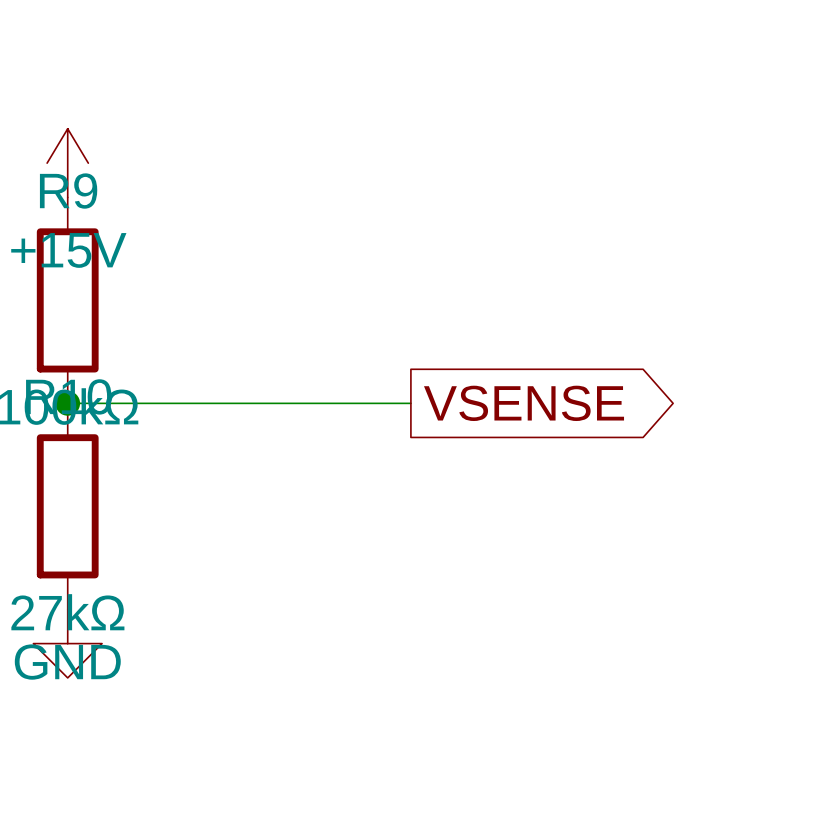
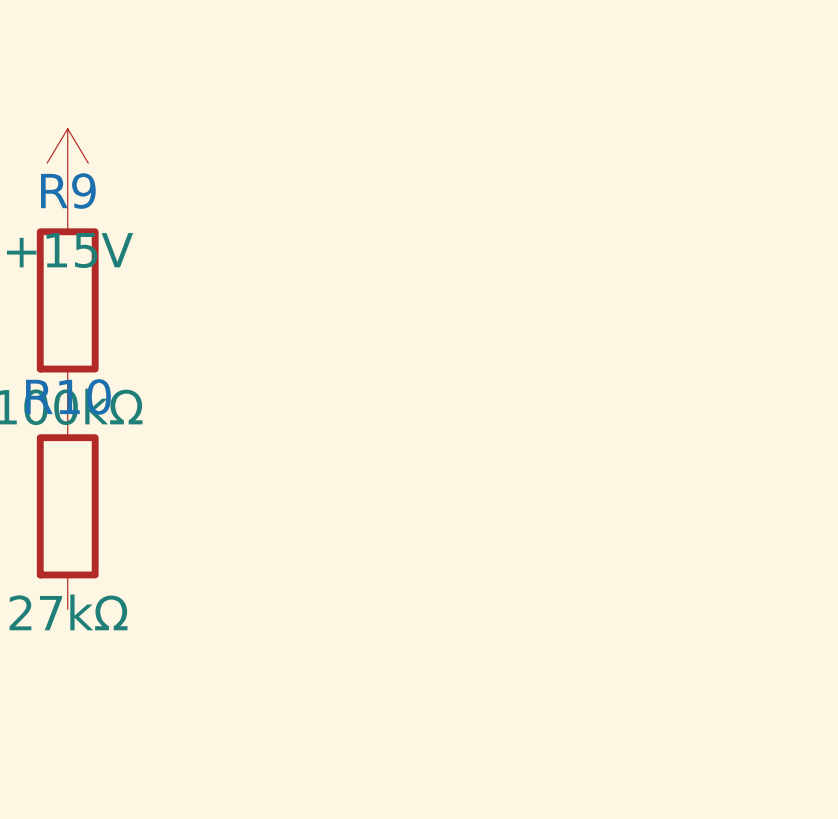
wire: (67, 403) (410, 403) -> none
junction: (67, 403) -> none
global label: VSENSE (524, 403) -> none
power symbol: GND (67, 643) -> none

